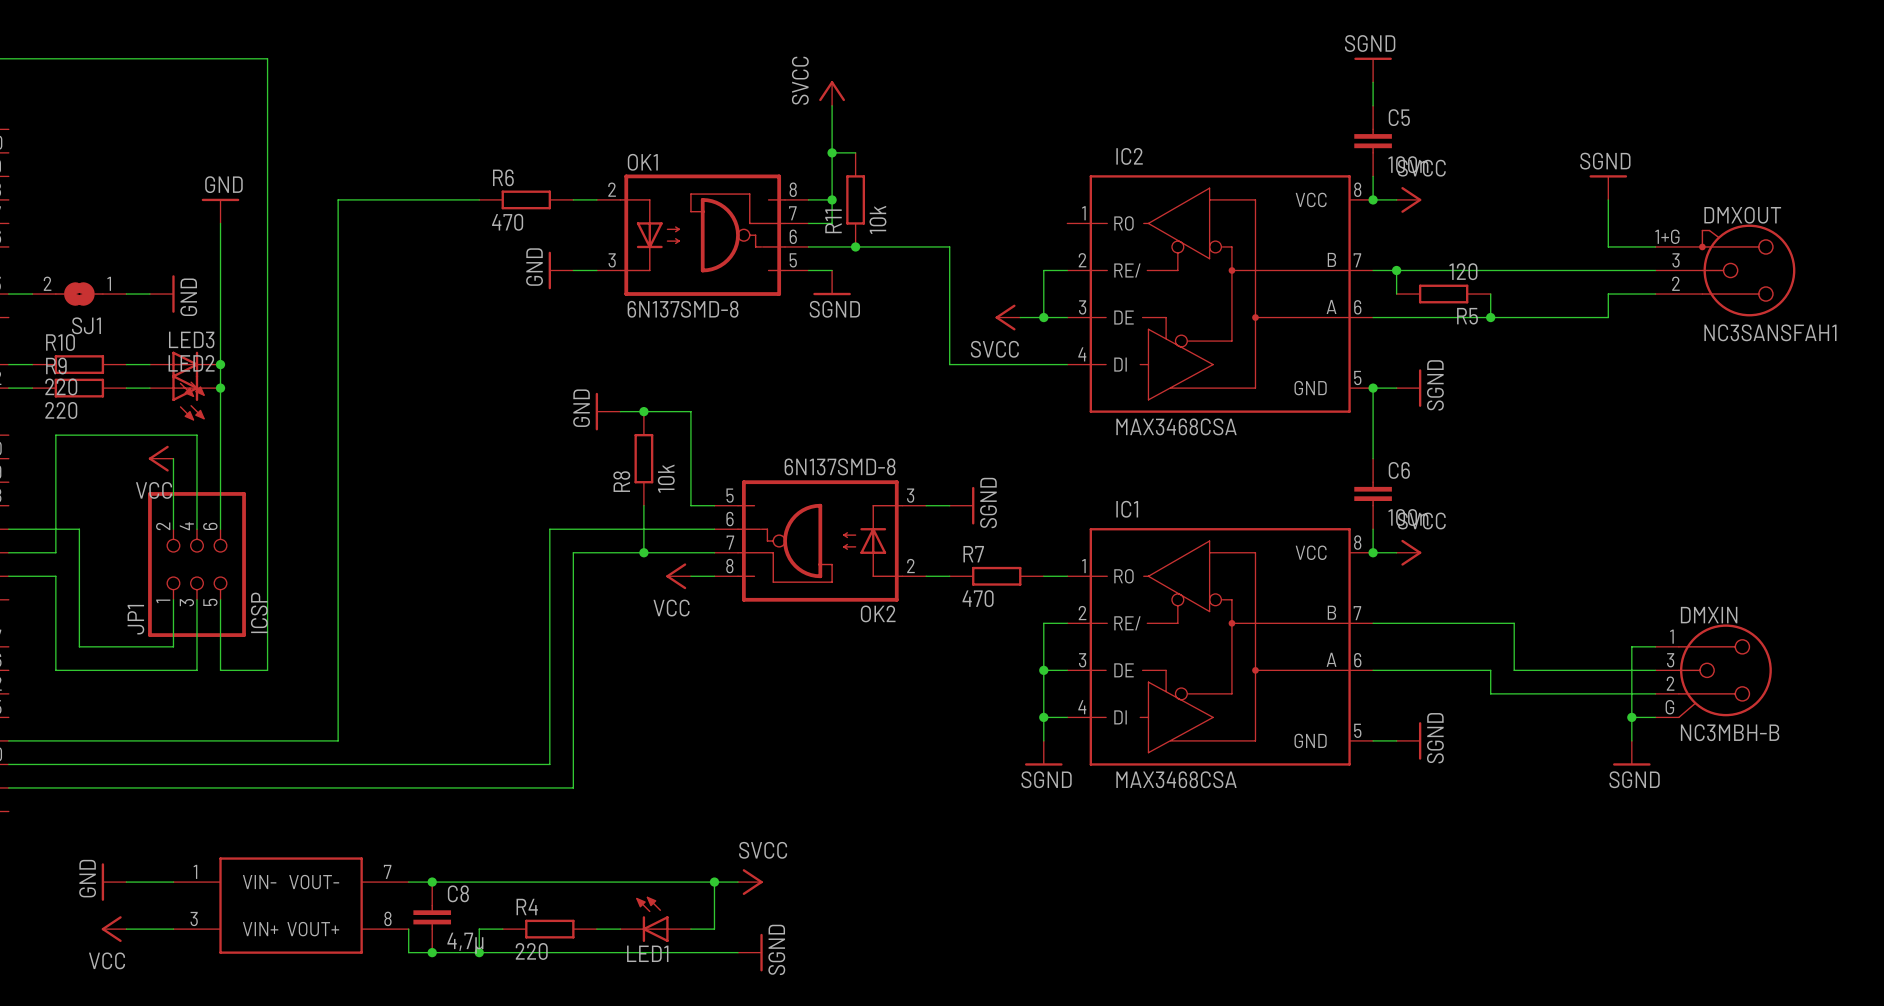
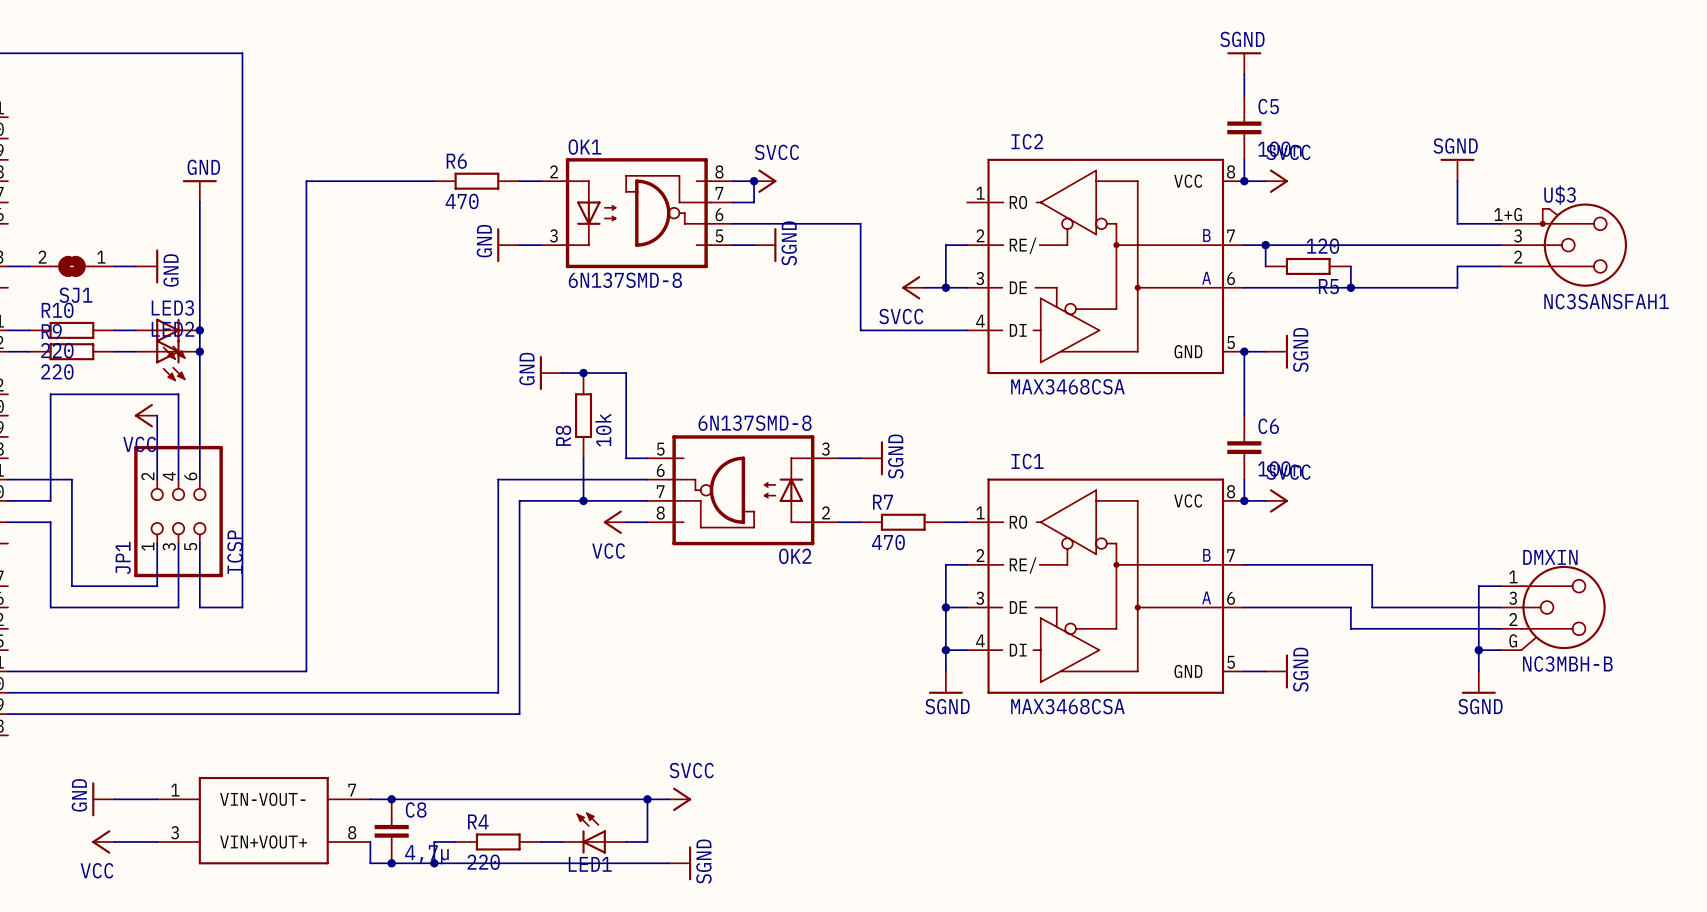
power symbol rotation: 0° (832, 91) -> 90° clockwise (767, 181)
power symbol position: SVCC (832, 93) -> SVCC (765, 181)
wire: (832, 105) (832, 199) -> none
wire: (832, 152) (855, 152) -> none
junction: (832, 152) -> none
R11: 10k (855, 199) -> none
DMXOUT name: DMXOUT (1742, 215) -> U$3 (1560, 195)
junction: (855, 246) -> none
power symbol rotation: 0° (832, 294) -> 90° counterclockwise (775, 245)

